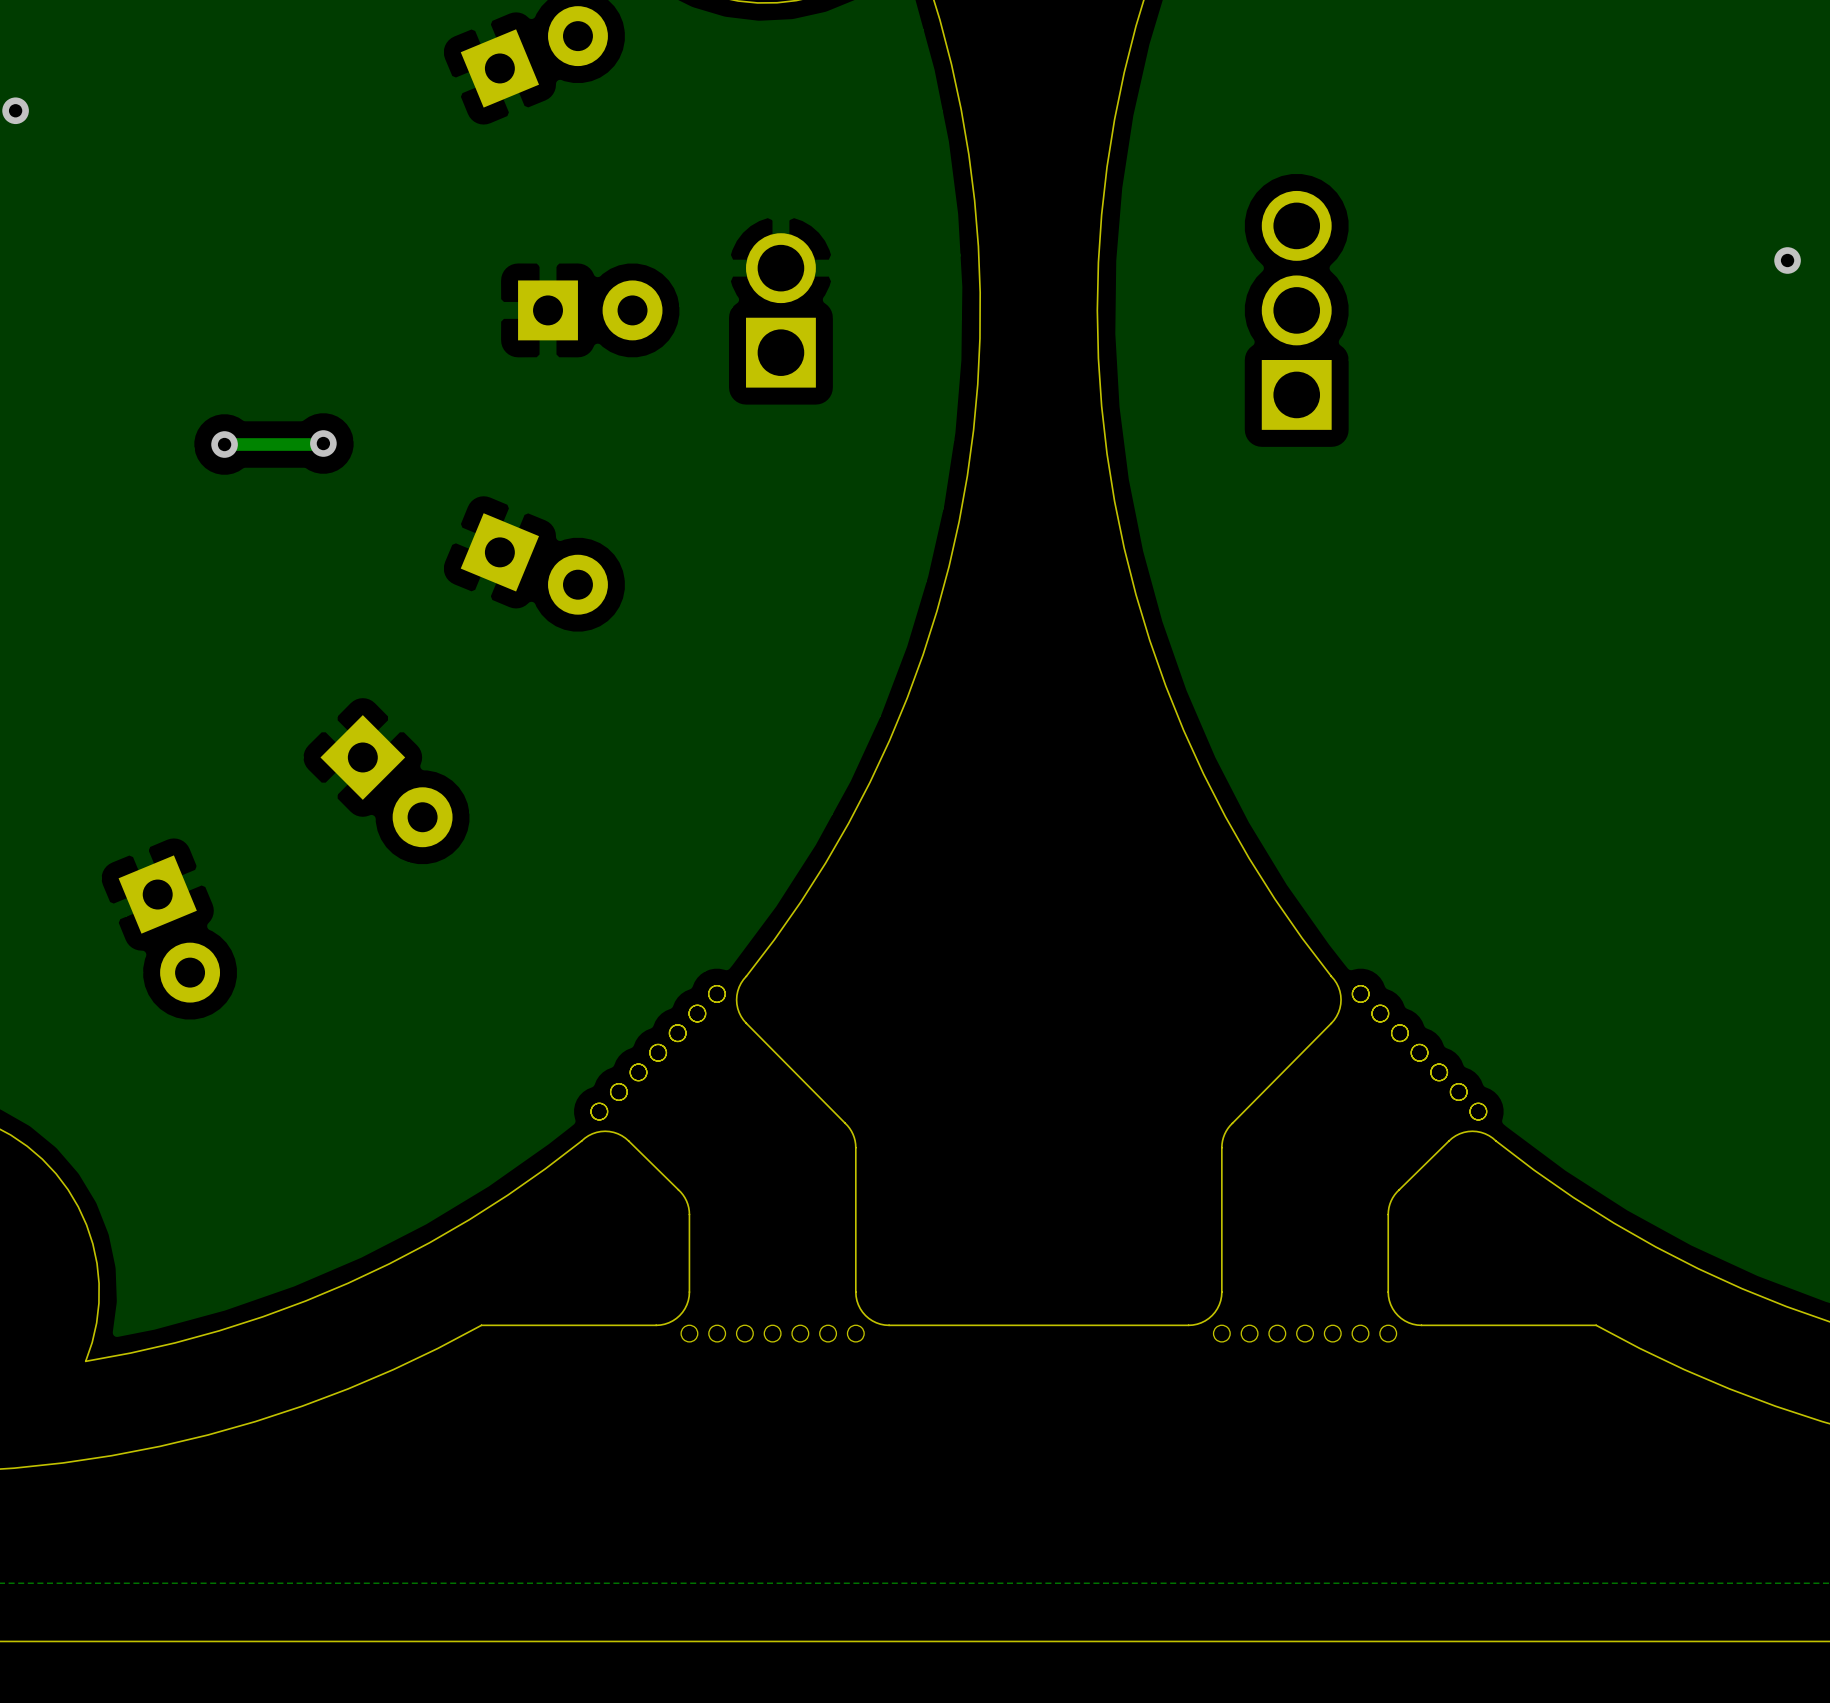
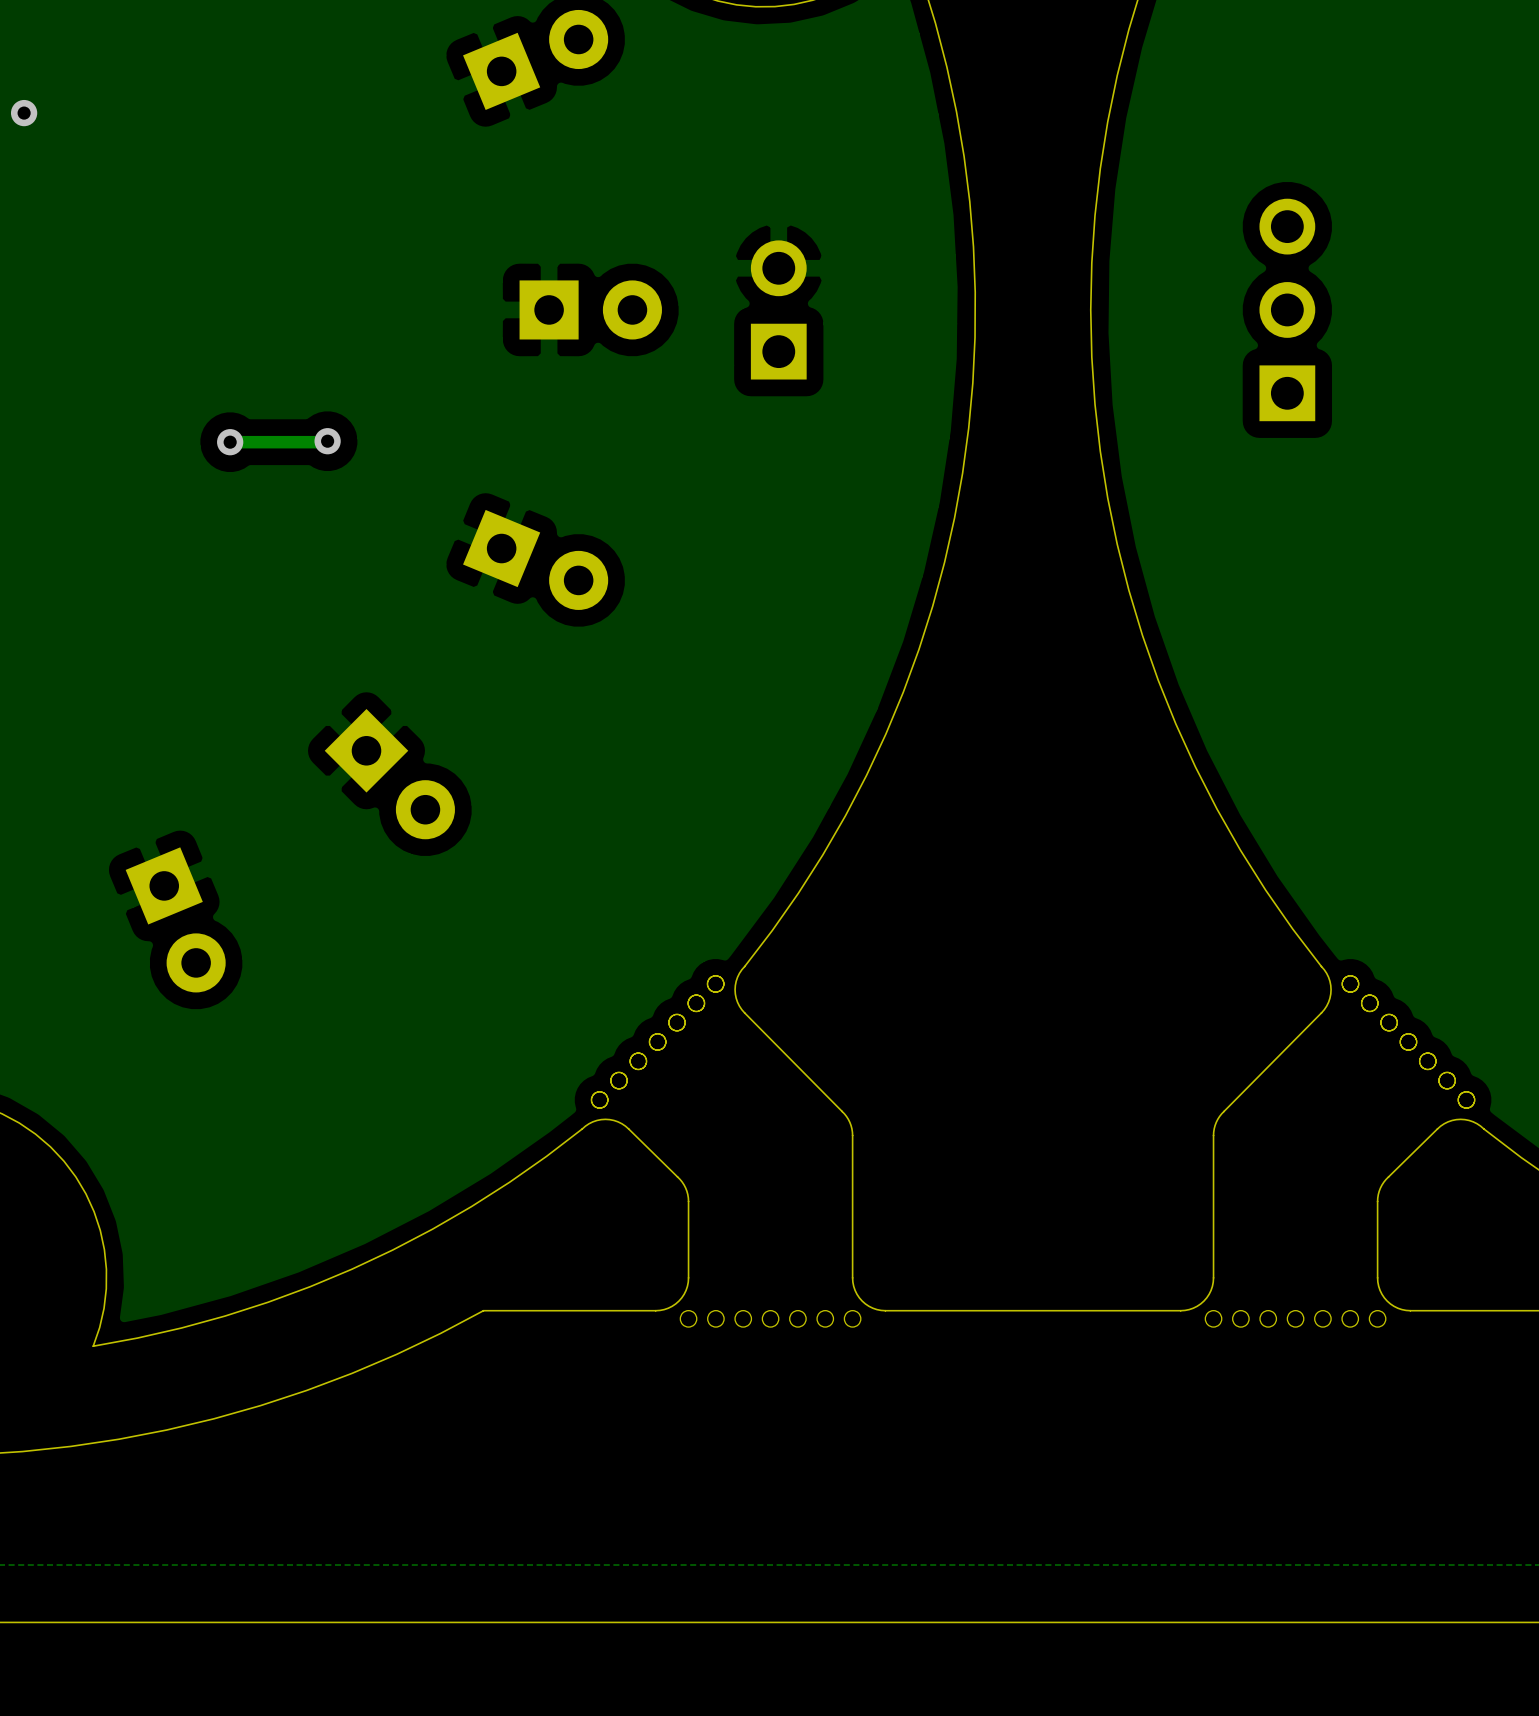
part footprint: [1261, 190, 1332, 430] -> [1259, 198, 1316, 422]
part footprint: [746, 233, 816, 388] -> [750, 240, 807, 380]

